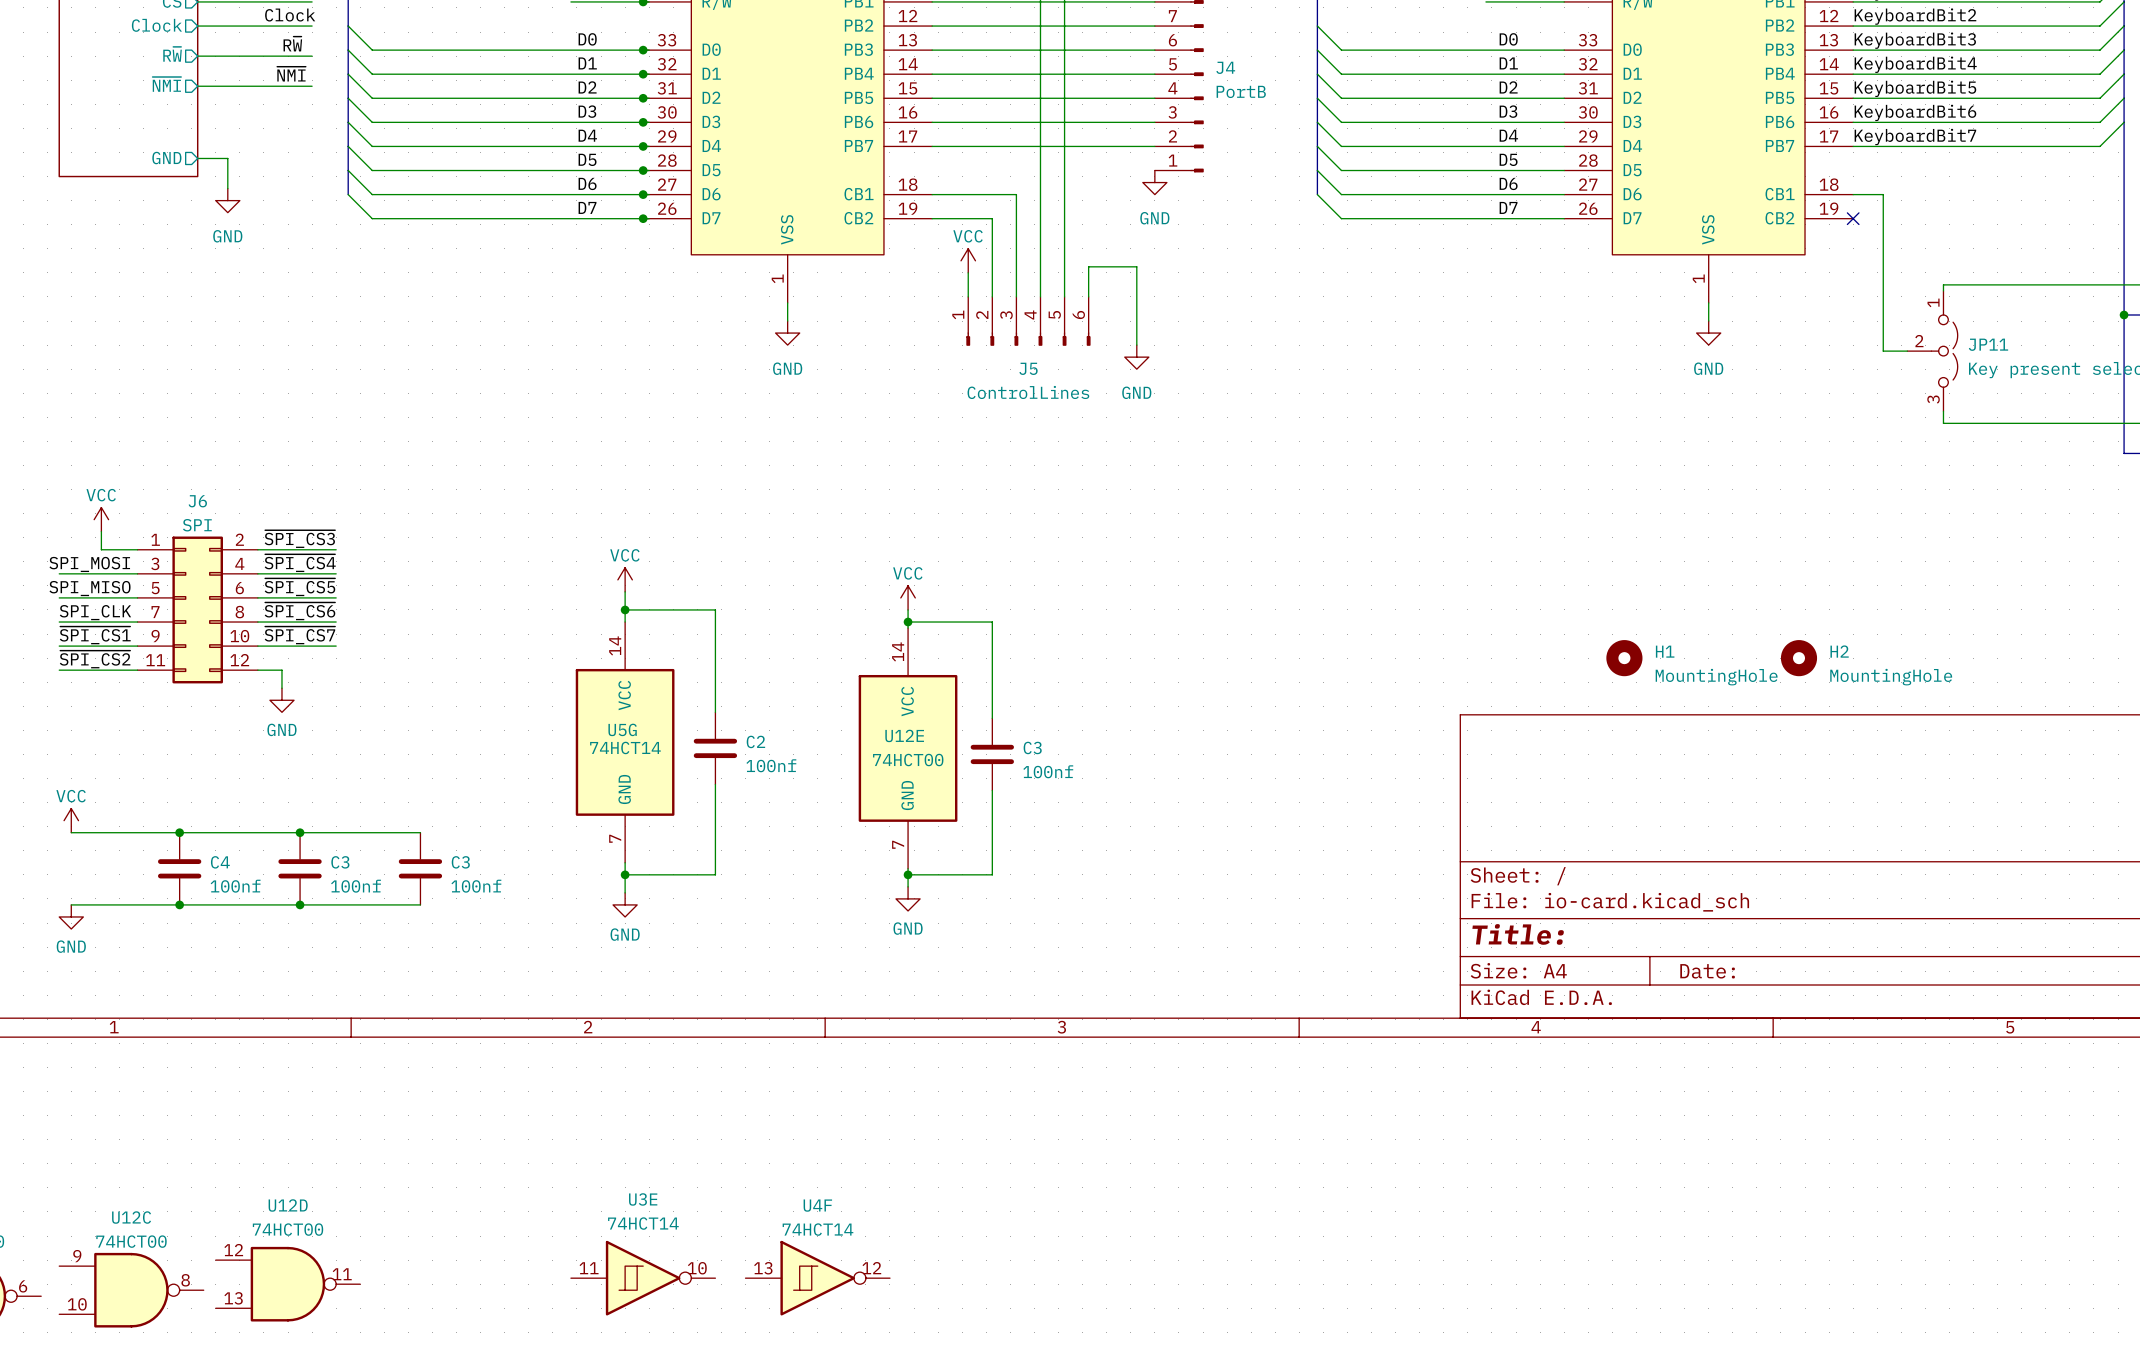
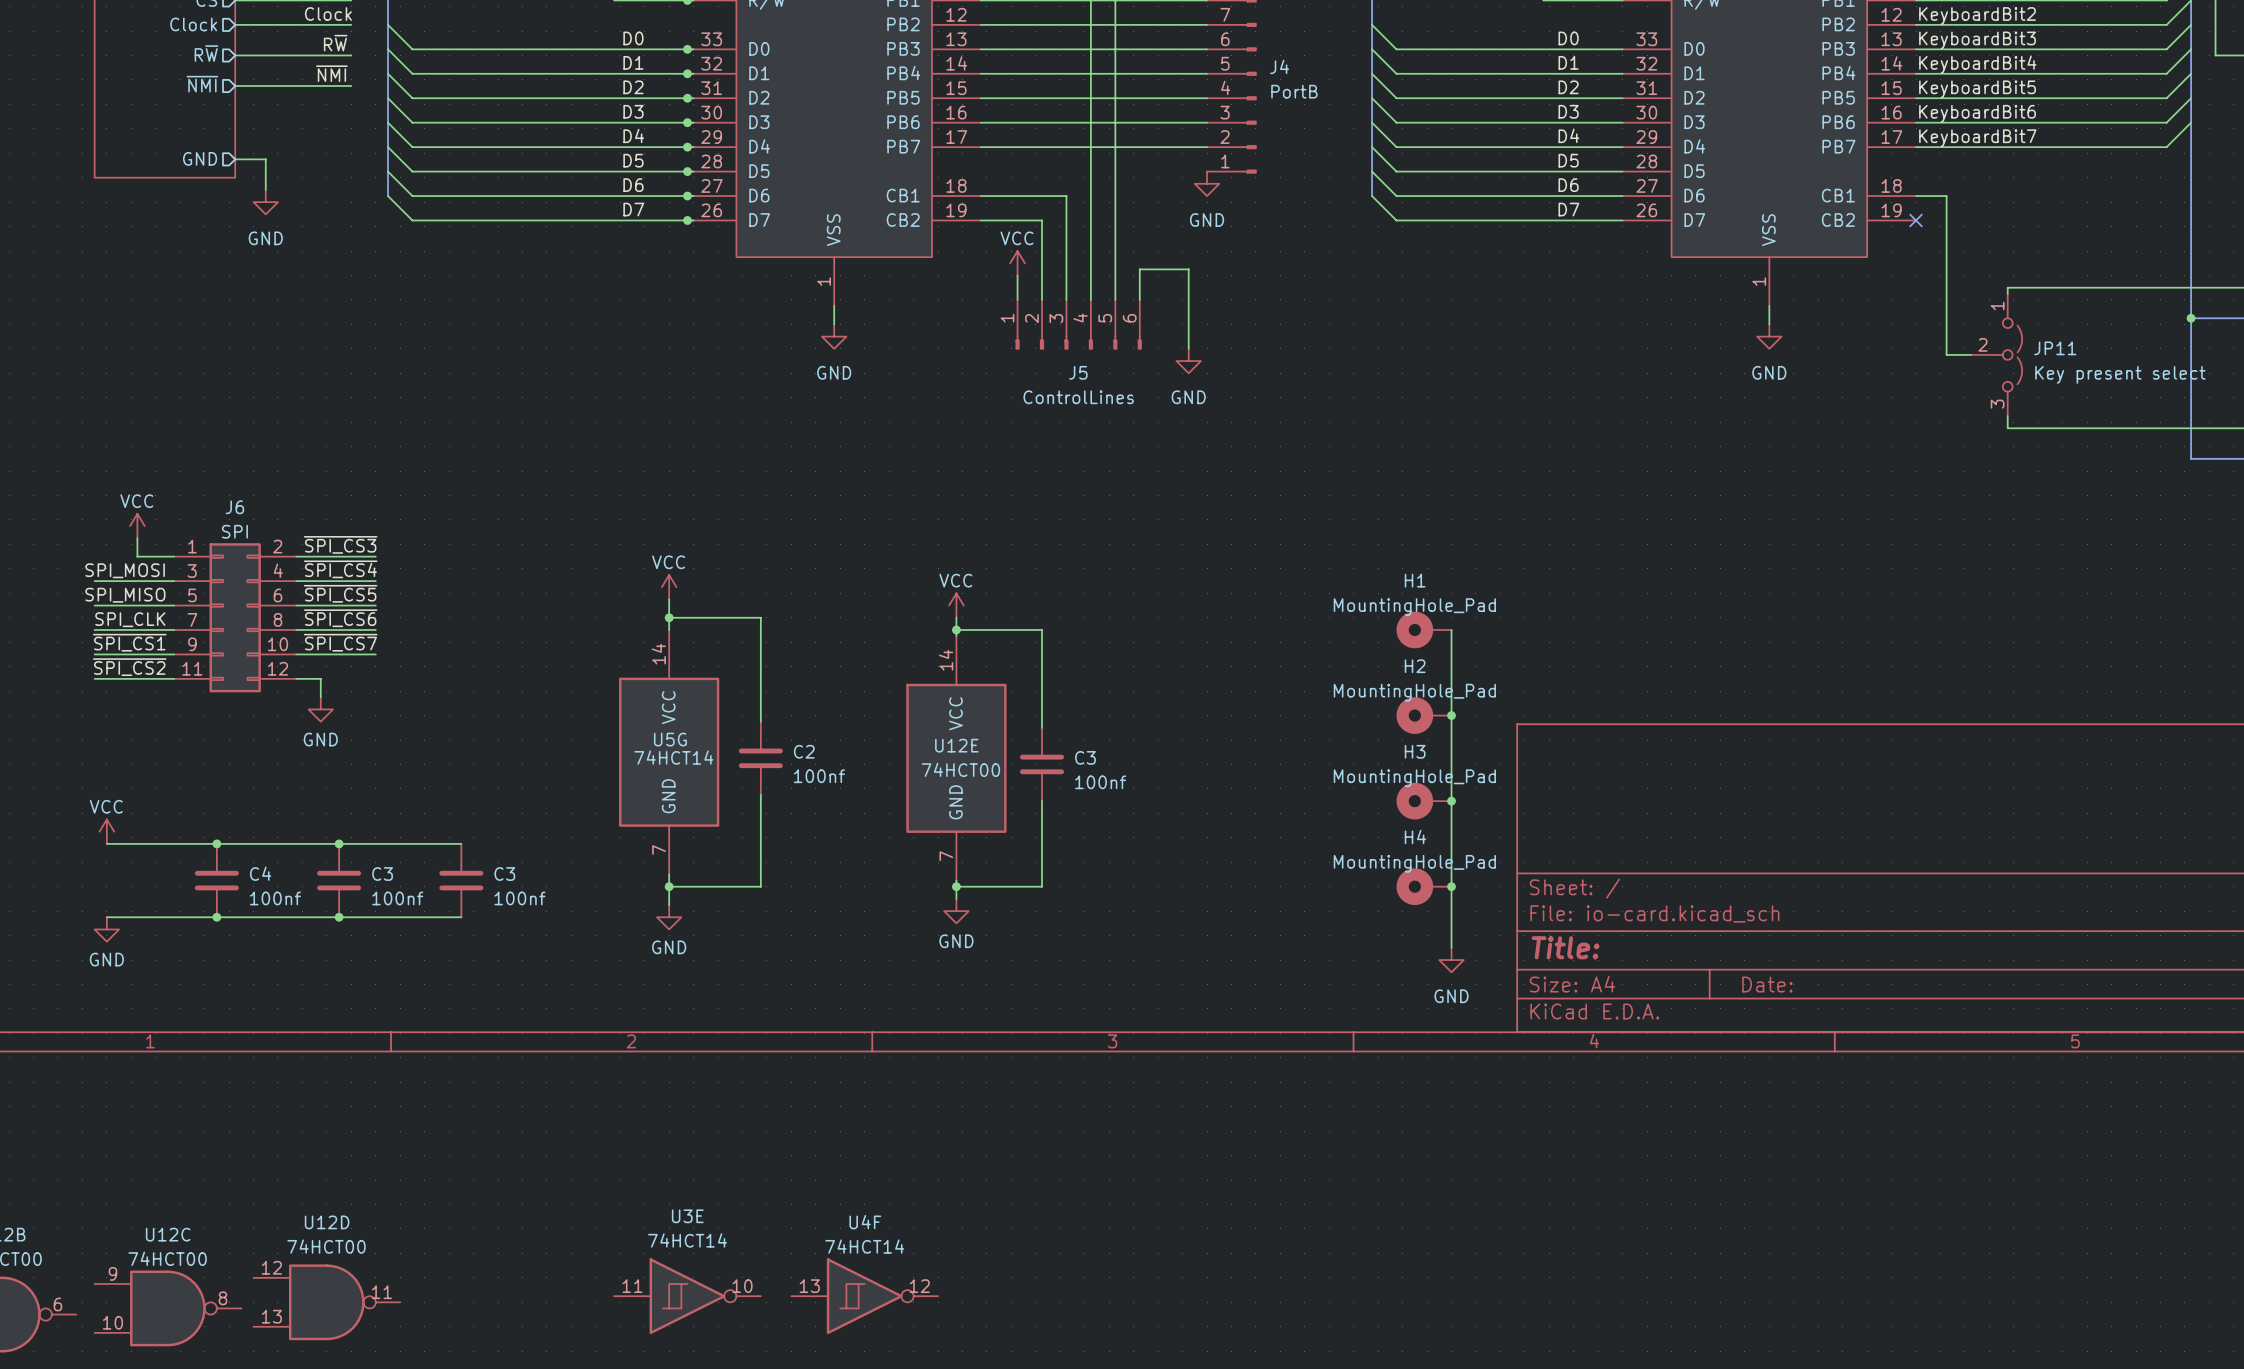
wire: none -> (1451, 629) (1451, 947)
H1 symbol: [1606, 640, 1643, 677] -> [1396, 611, 1452, 649]
H2 symbol: [1780, 640, 1818, 677] -> [1396, 697, 1452, 734]
H1 name position: H1 (1665, 651) -> H1 (1415, 580)
H2 name position: H2 (1839, 651) -> H2 (1415, 666)
H1 value: MountingHole (1716, 677) -> MountingHole_Pad (1414, 607)
H2 value: MountingHole (1891, 677) -> MountingHole_Pad (1414, 692)
junction: none -> (1451, 715)
H3: none -> MountingHole_Pad (1424, 801)
junction: none -> (1451, 801)
H4: none -> MountingHole_Pad (1424, 886)
junction: none -> (1451, 886)
power symbol: none -> GND (1451, 960)

